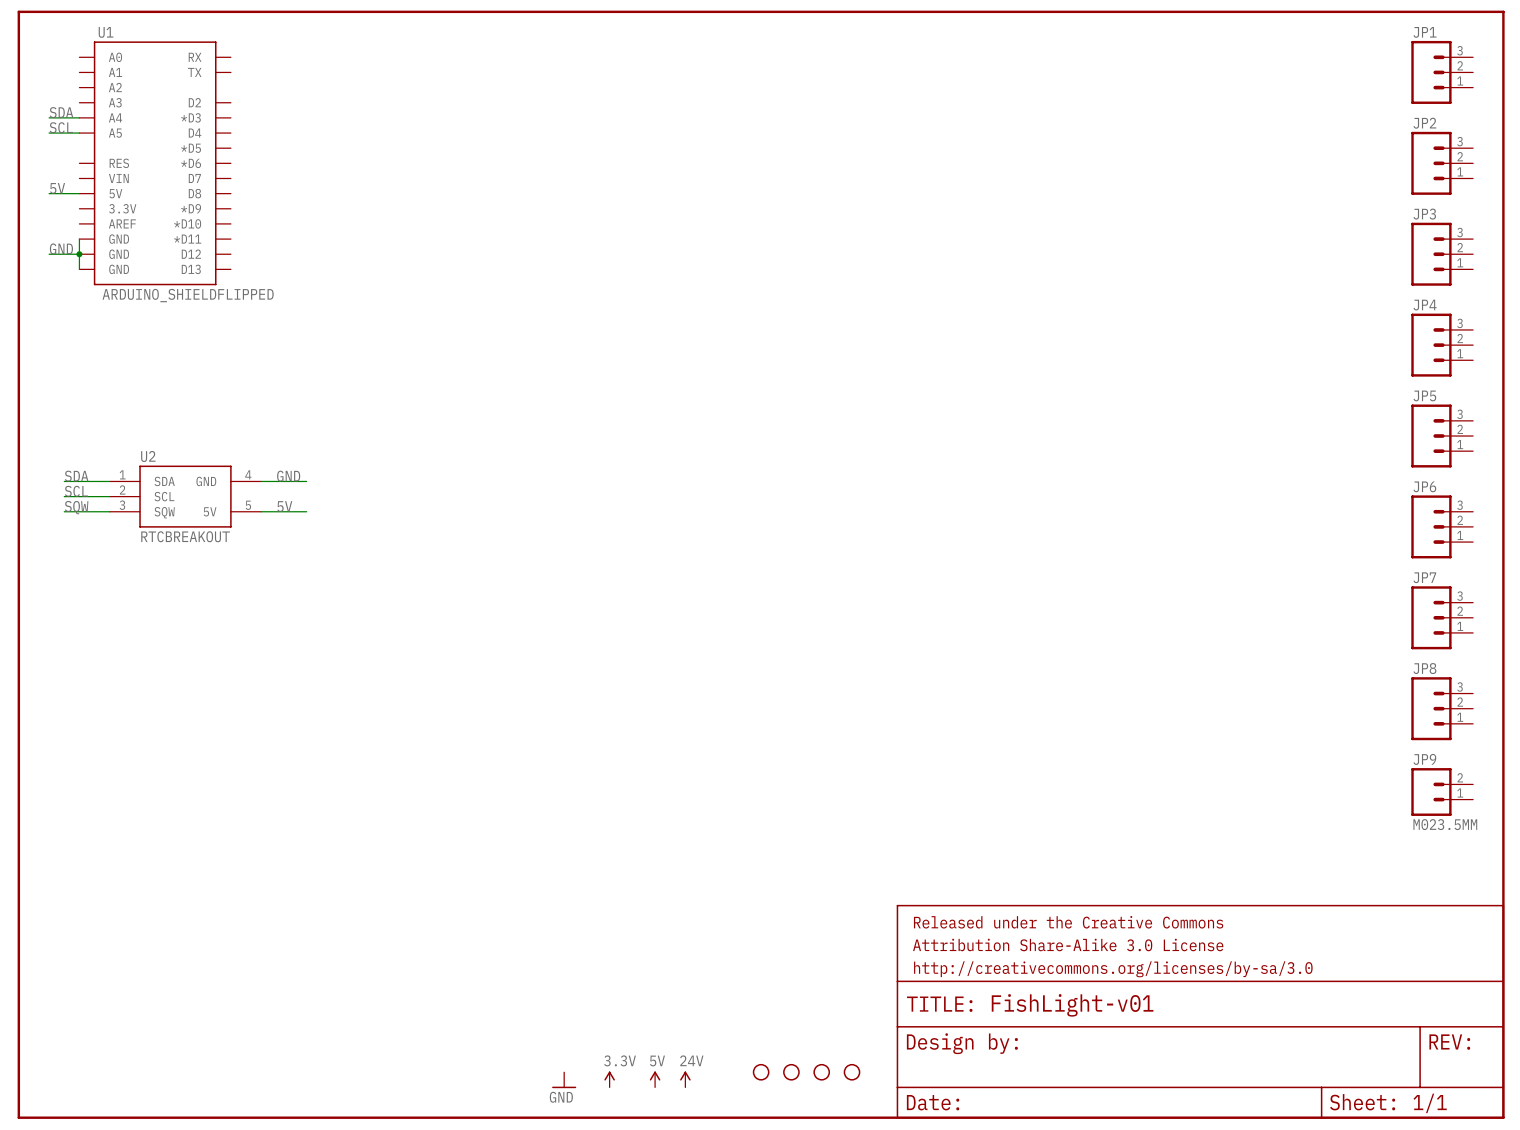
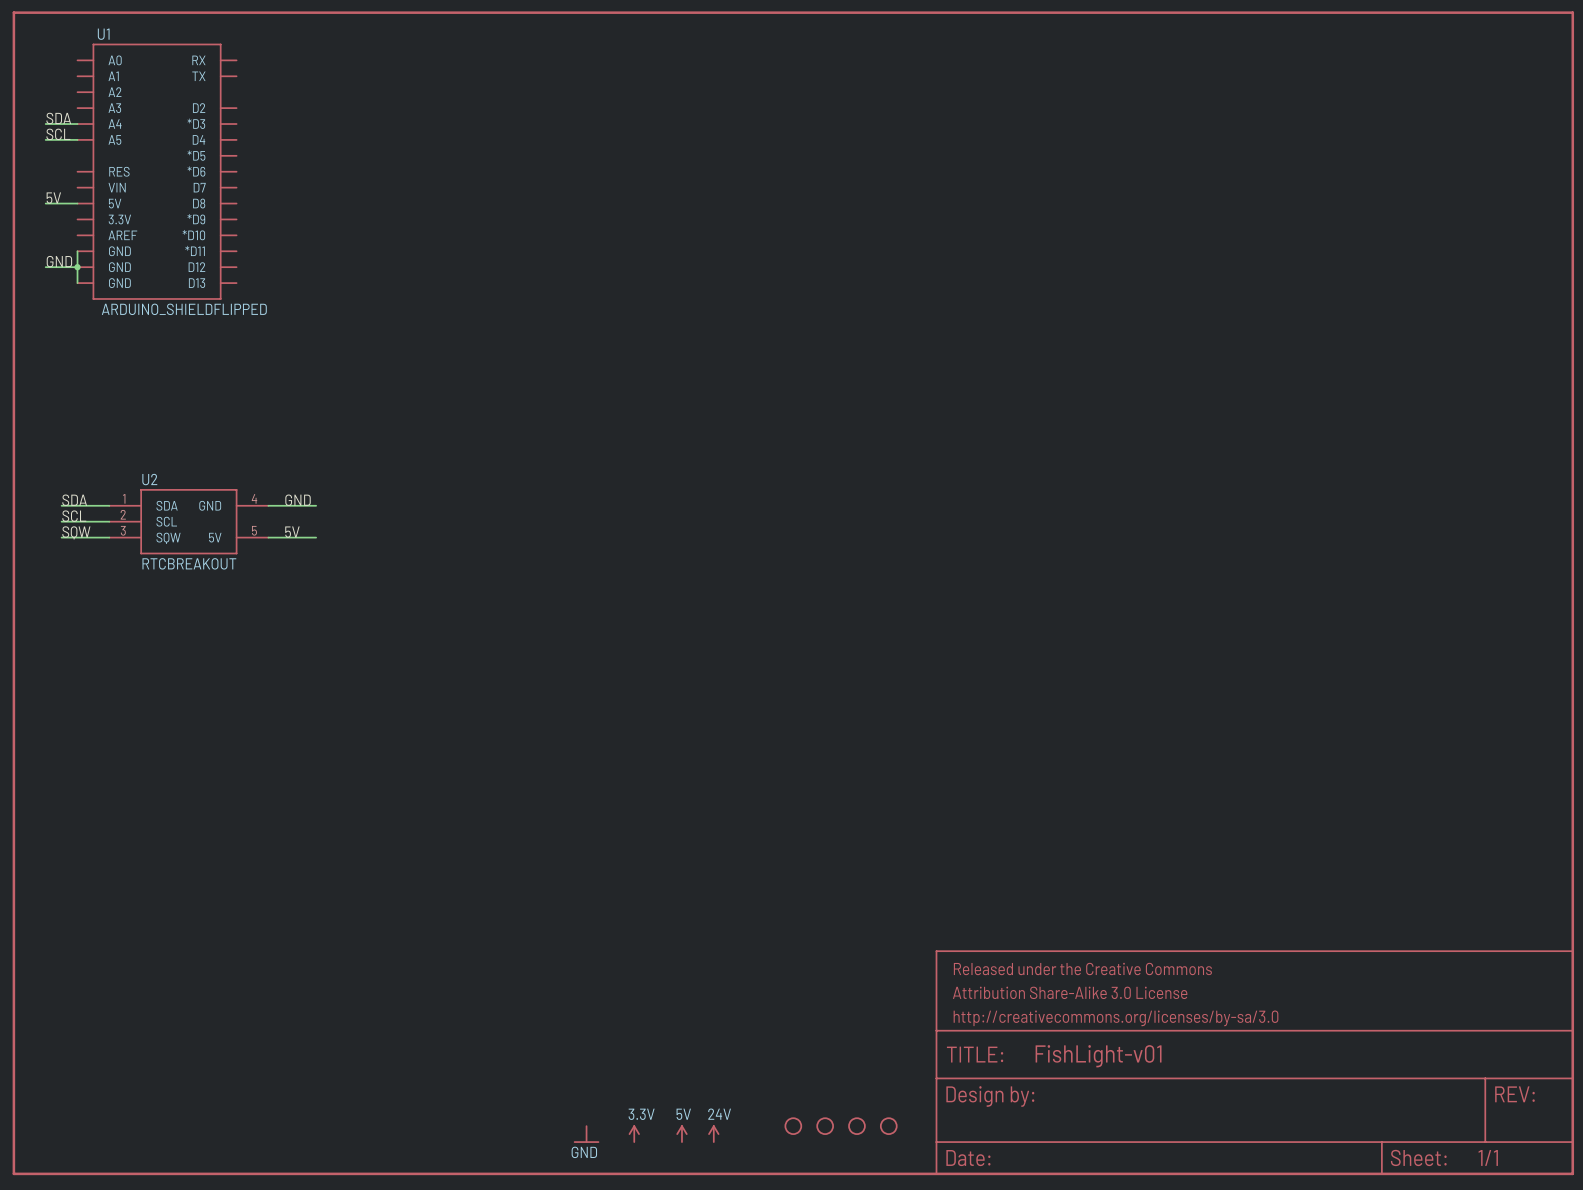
JP1: (1442, 72) -> none
JP2: (1442, 163) -> none
JP3: (1442, 254) -> none
JP4: (1442, 345) -> none
JP5: (1442, 436) -> none
JP6: (1442, 526) -> none
JP7: (1442, 617) -> none
JP8: (1442, 708) -> none
JP9: M023.5MM (1442, 792) -> none

